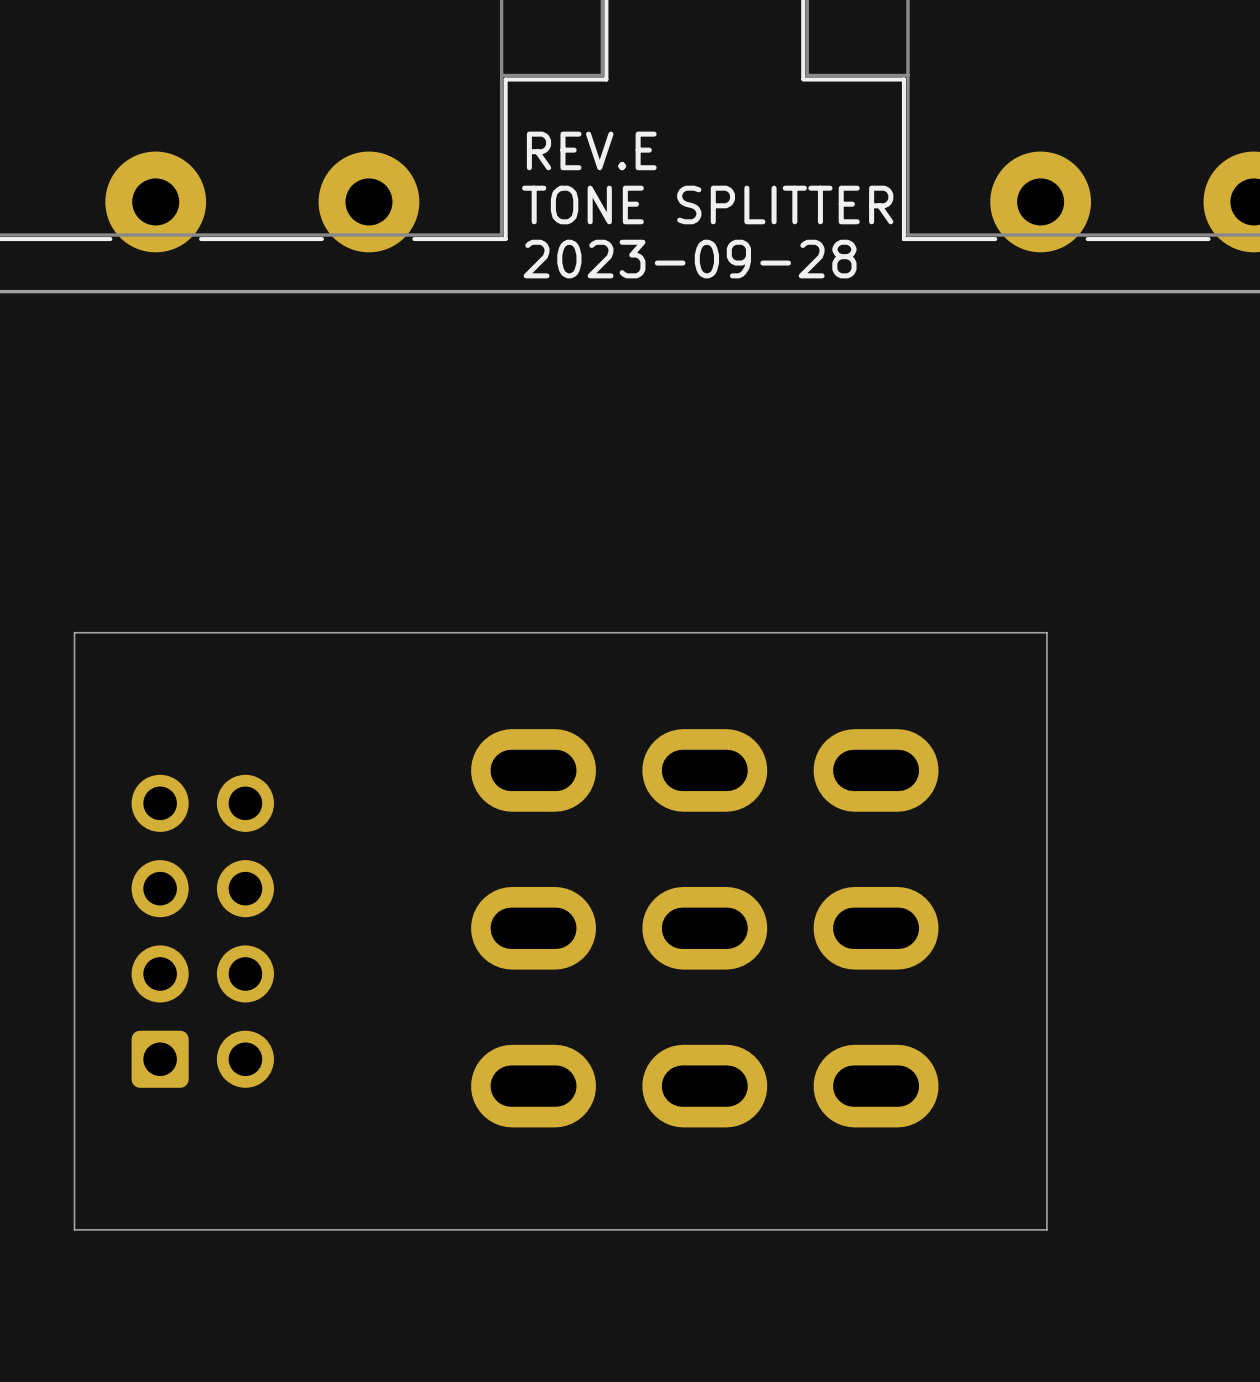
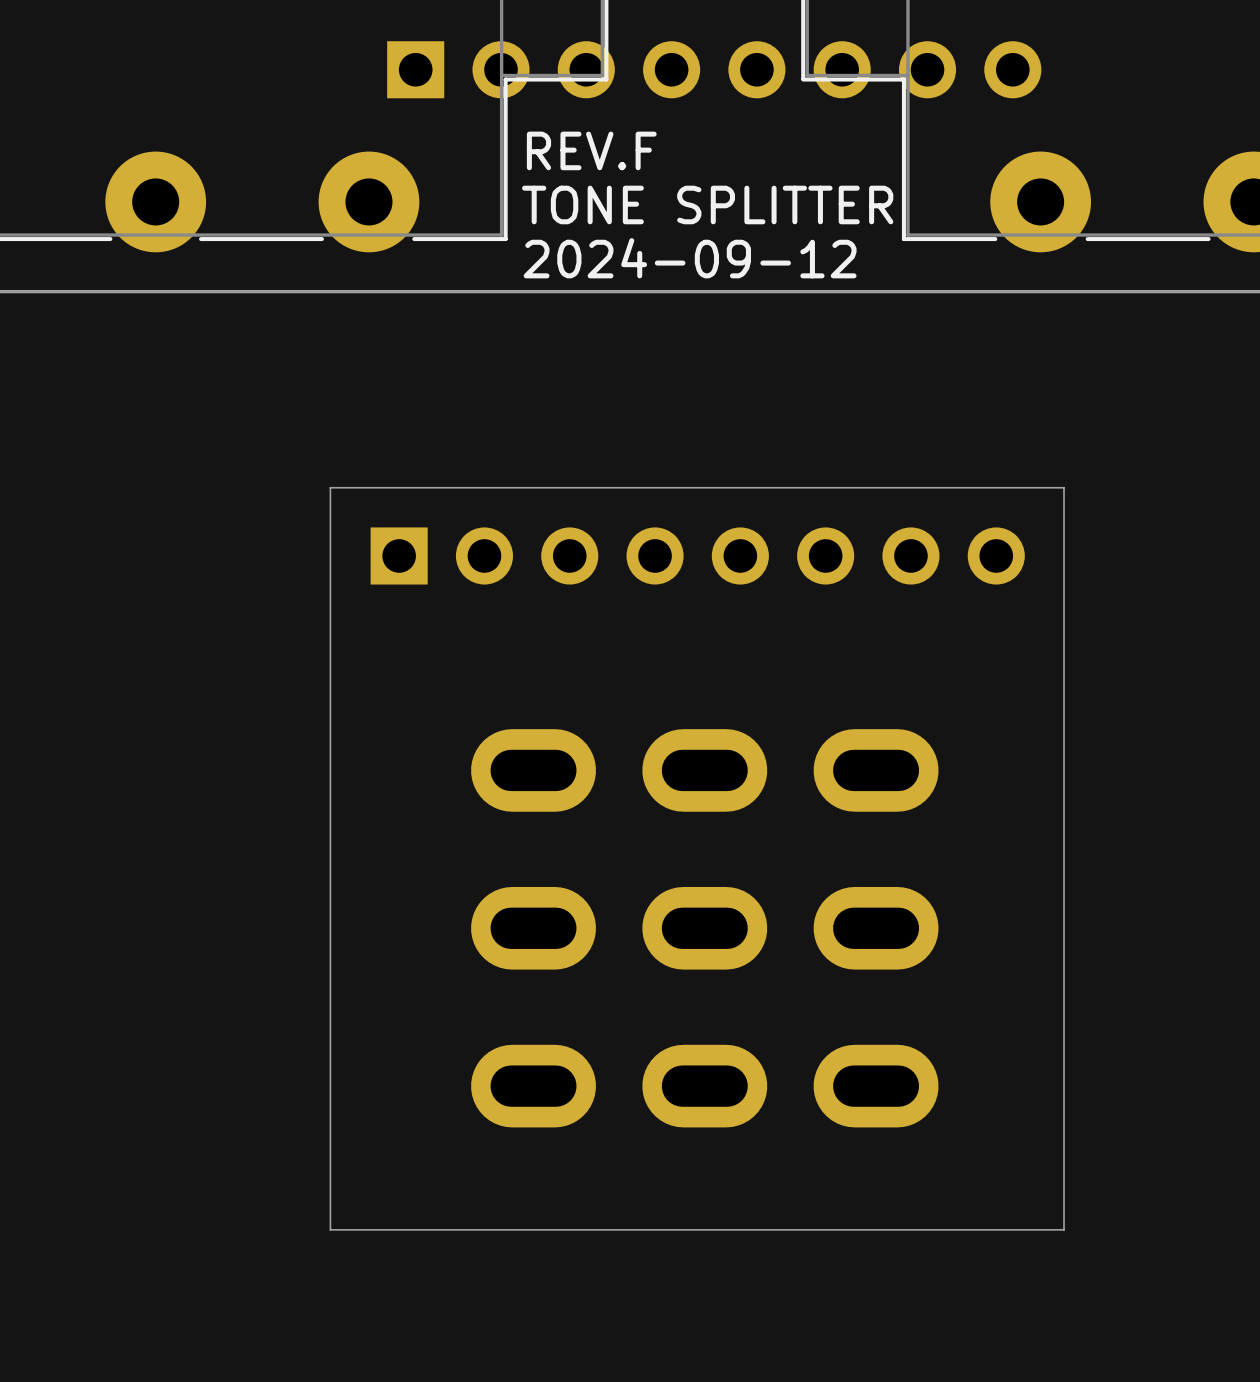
part: none -> (714, 69)
text: REV.E (591, 150) -> REV.F (591, 150)
text: 2023-09-28 (690, 259) -> 2024-09-12 (690, 258)
part: none -> (697, 555)
part: (202, 931) -> none
board edge: (1046, 1229) (1046, 632) (74, 632) (74, 1229) (330, 1229) -> (1046, 1229) (1064, 1229) (1064, 487) (330, 487) (330, 1229)

